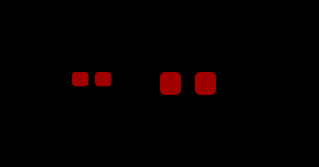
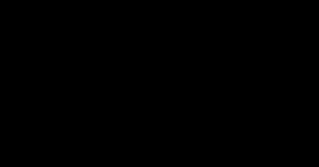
part: (91, 79) -> none
part: (188, 83) -> none

